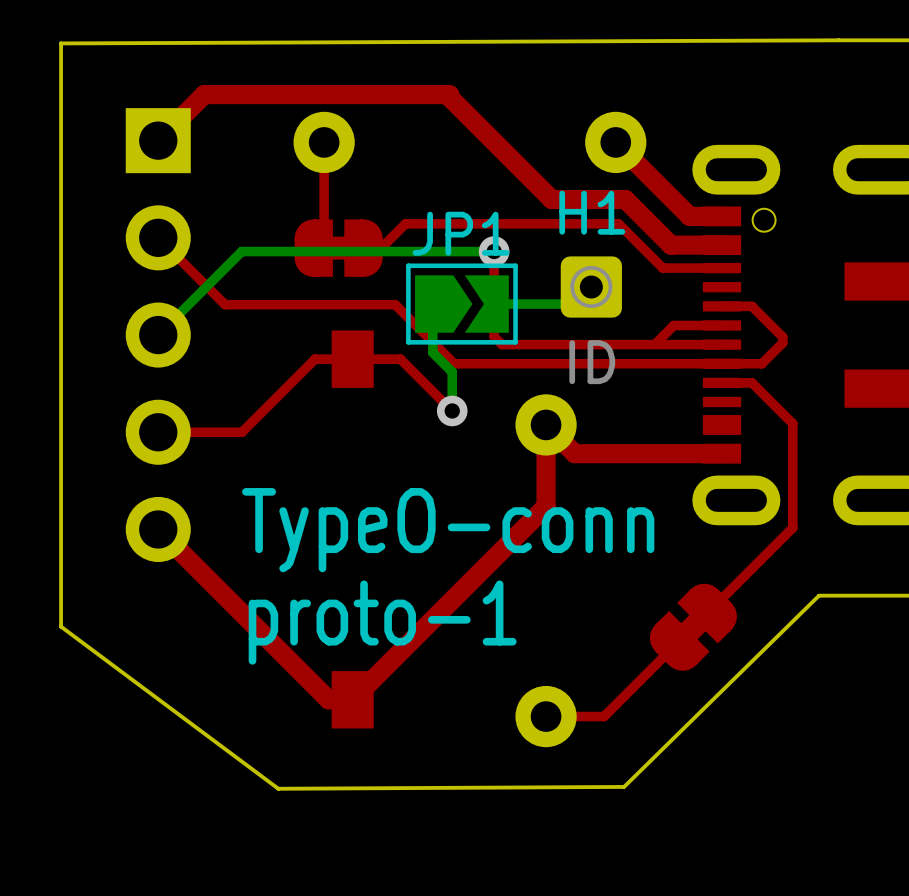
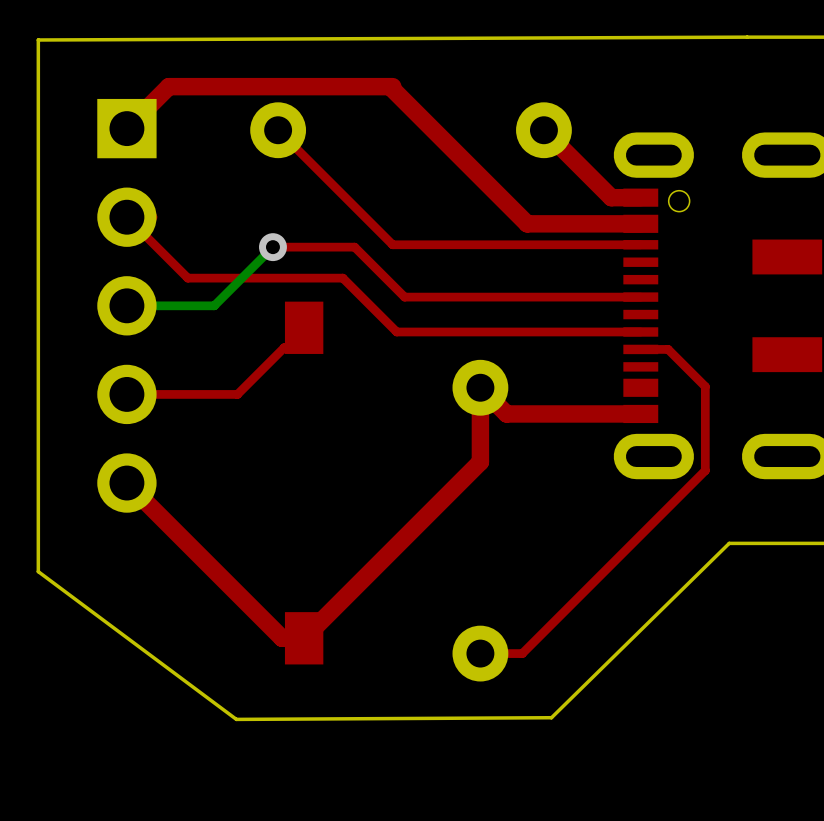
top track: (324, 142) (324, 237) (313, 248) -> none
top track: (551, 199) (625, 199) (670, 245) -> (485, 182) (527, 223) (594, 223)
part: (338, 248) -> none
top track: (363, 248) (381, 248) (405, 223) (618, 223) (662, 268) -> (278, 130) (392, 244) (586, 244)
top track: (494, 251) (494, 336) (502, 344) (722, 344) -> none
bottom track: (494, 251) (241, 251) (158, 335) -> (272, 247) (214, 305) (126, 305)
via: (494, 251) -> none
via: none -> (272, 247)
bottom track: (591, 287) (574, 304) (489, 304) -> none
H1: ID (591, 287) -> none
bottom track: (434, 304) (432, 352) (452, 372) (452, 410) -> none
JP1: (461, 304) -> none
top track: (722, 306) (752, 306) (782, 337) (782, 342) (761, 363) (722, 363) -> none
top track: (673, 325) (656, 342) -> (596, 297) (404, 297) (354, 247) (272, 247)
top track: (452, 410) (400, 359) (315, 359) (241, 432) -> (304, 347) (284, 347) (237, 394) (203, 394)
via: (452, 410) -> none
top track: (792, 515) (792, 527) (711, 609) -> (705, 470) (522, 653)
text: TypeO-conn (448, 530) -> none
text: proto-1 (382, 622) -> none
part: (693, 627) -> none
top track: (675, 644) (604, 716) (592, 716) -> none

